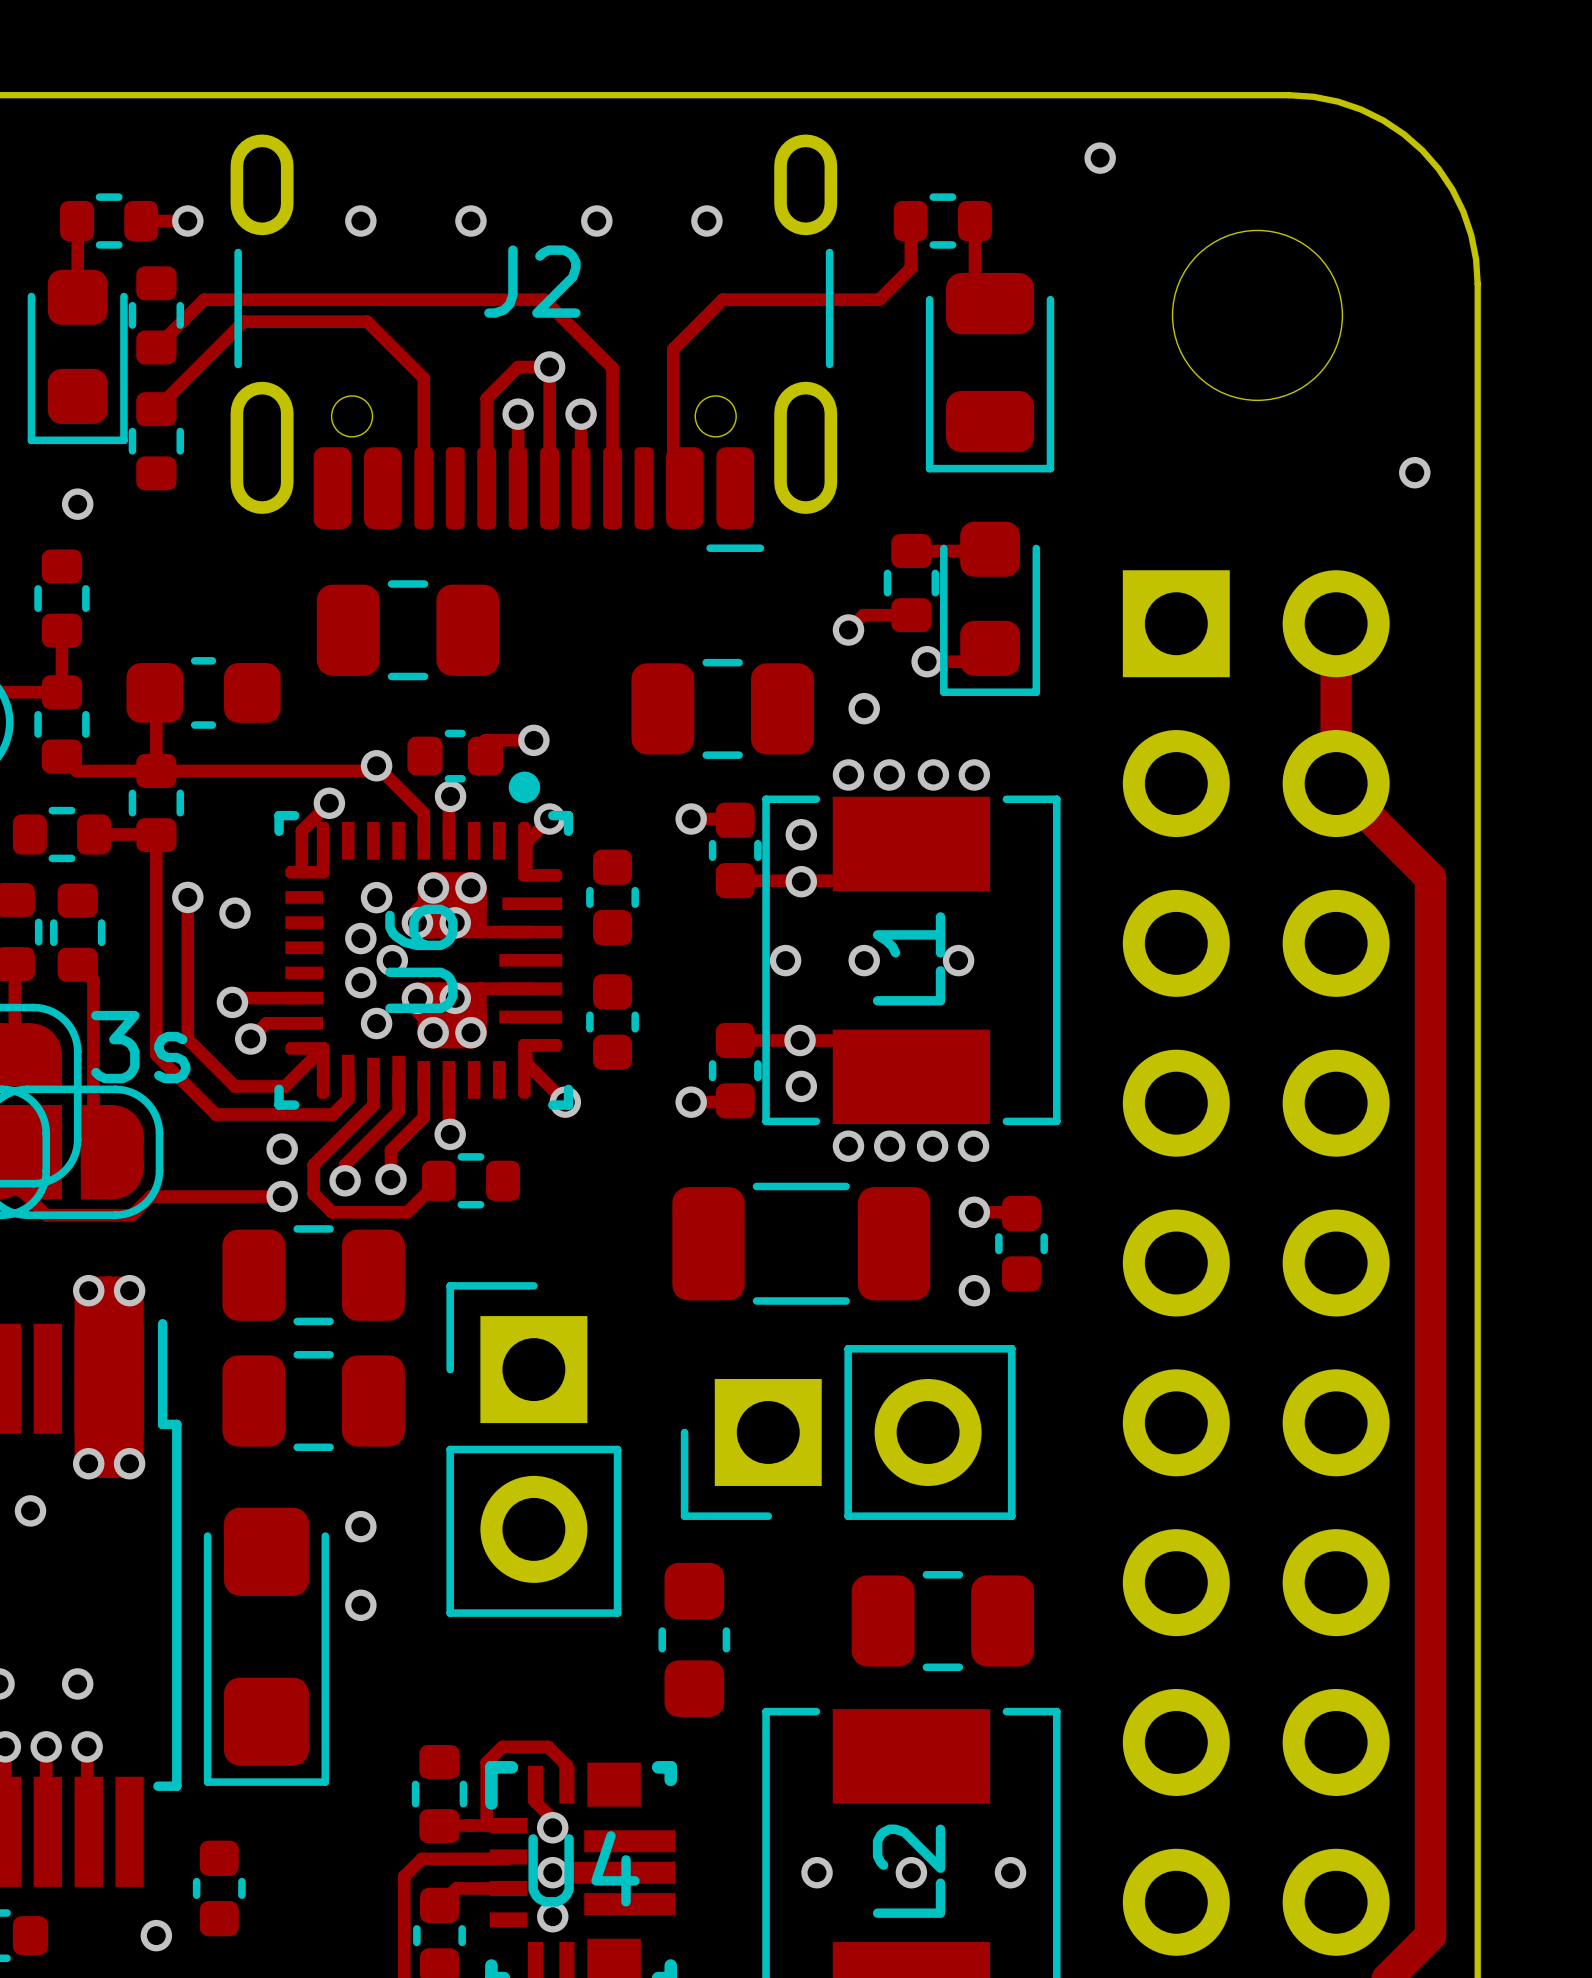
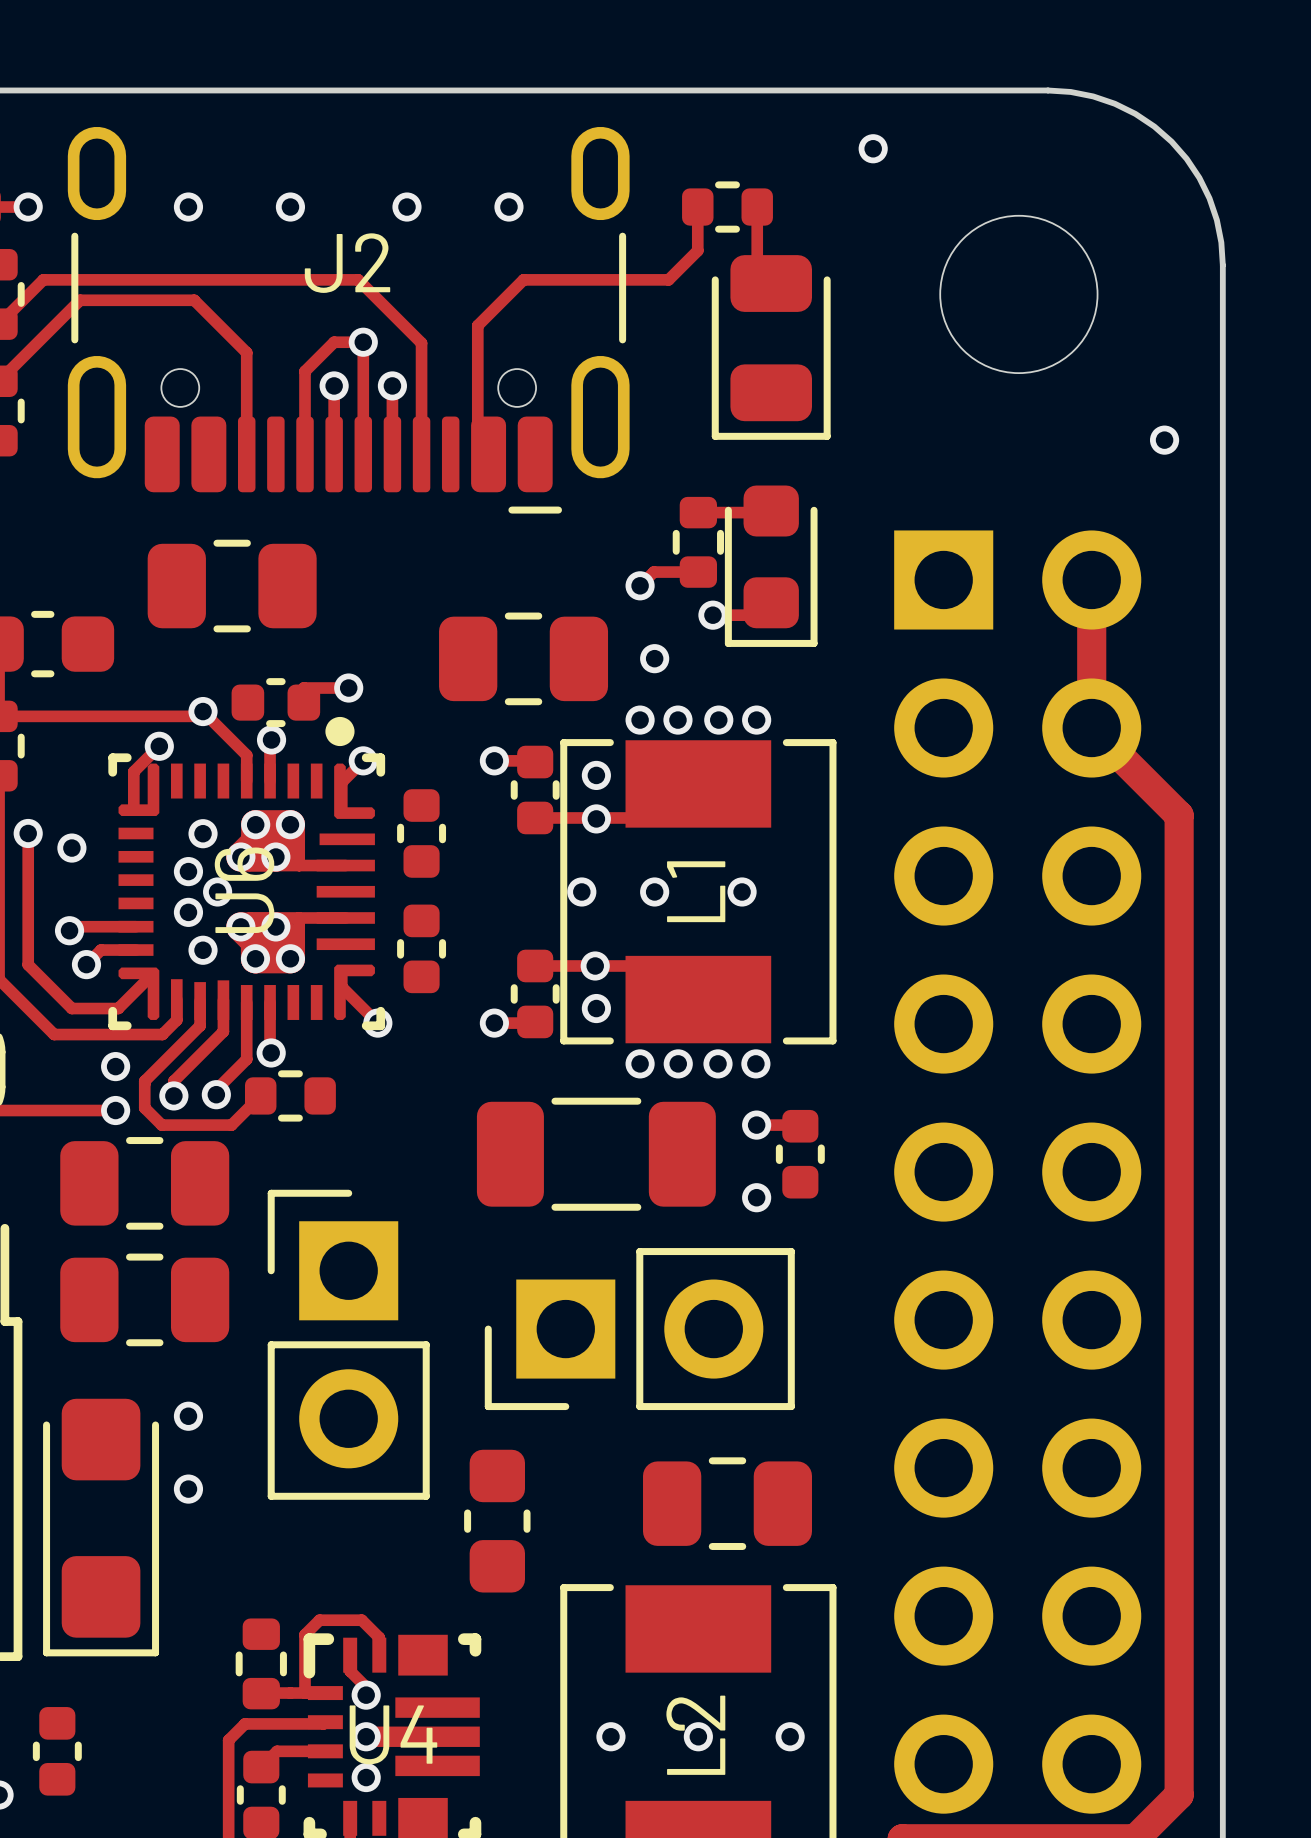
track: (423, 1117) (390, 1150) (390, 1174) -> (246, 1037) (246, 1059) (216, 1089)

